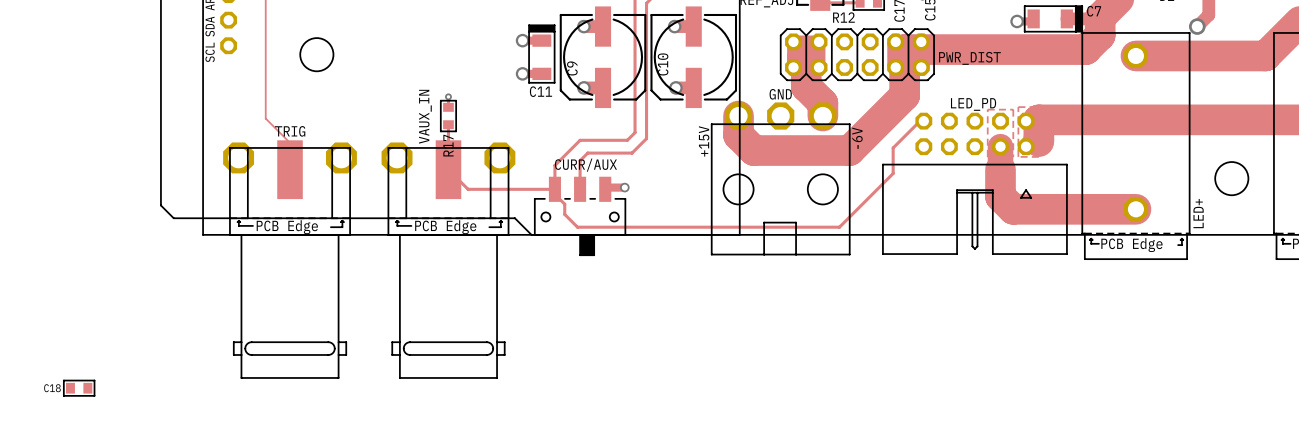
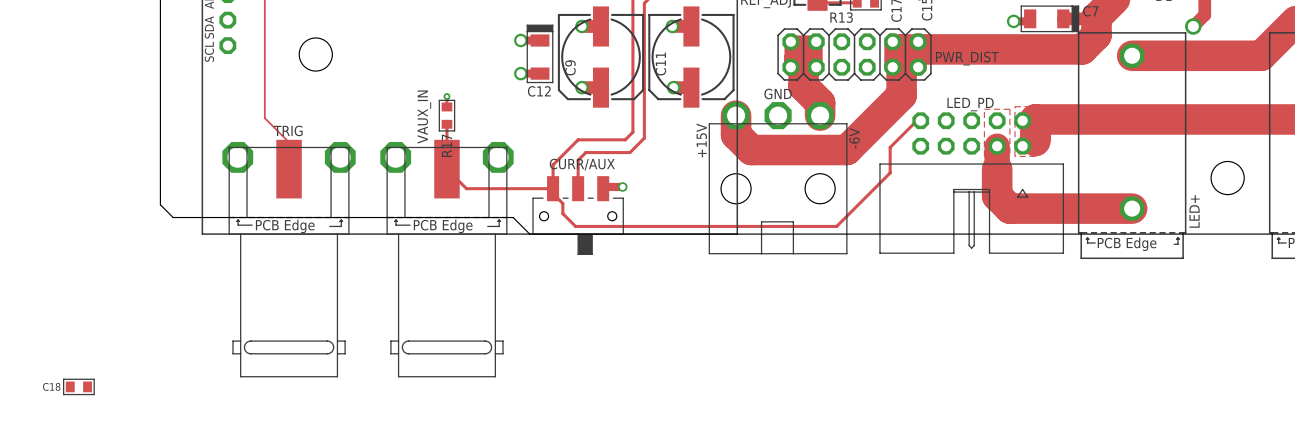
R12 name: R12 (843, 17) -> R13 (841, 17)
C10 name: C10 (663, 64) -> C11 (660, 63)
C11 name: C11 (540, 91) -> C12 (539, 91)

